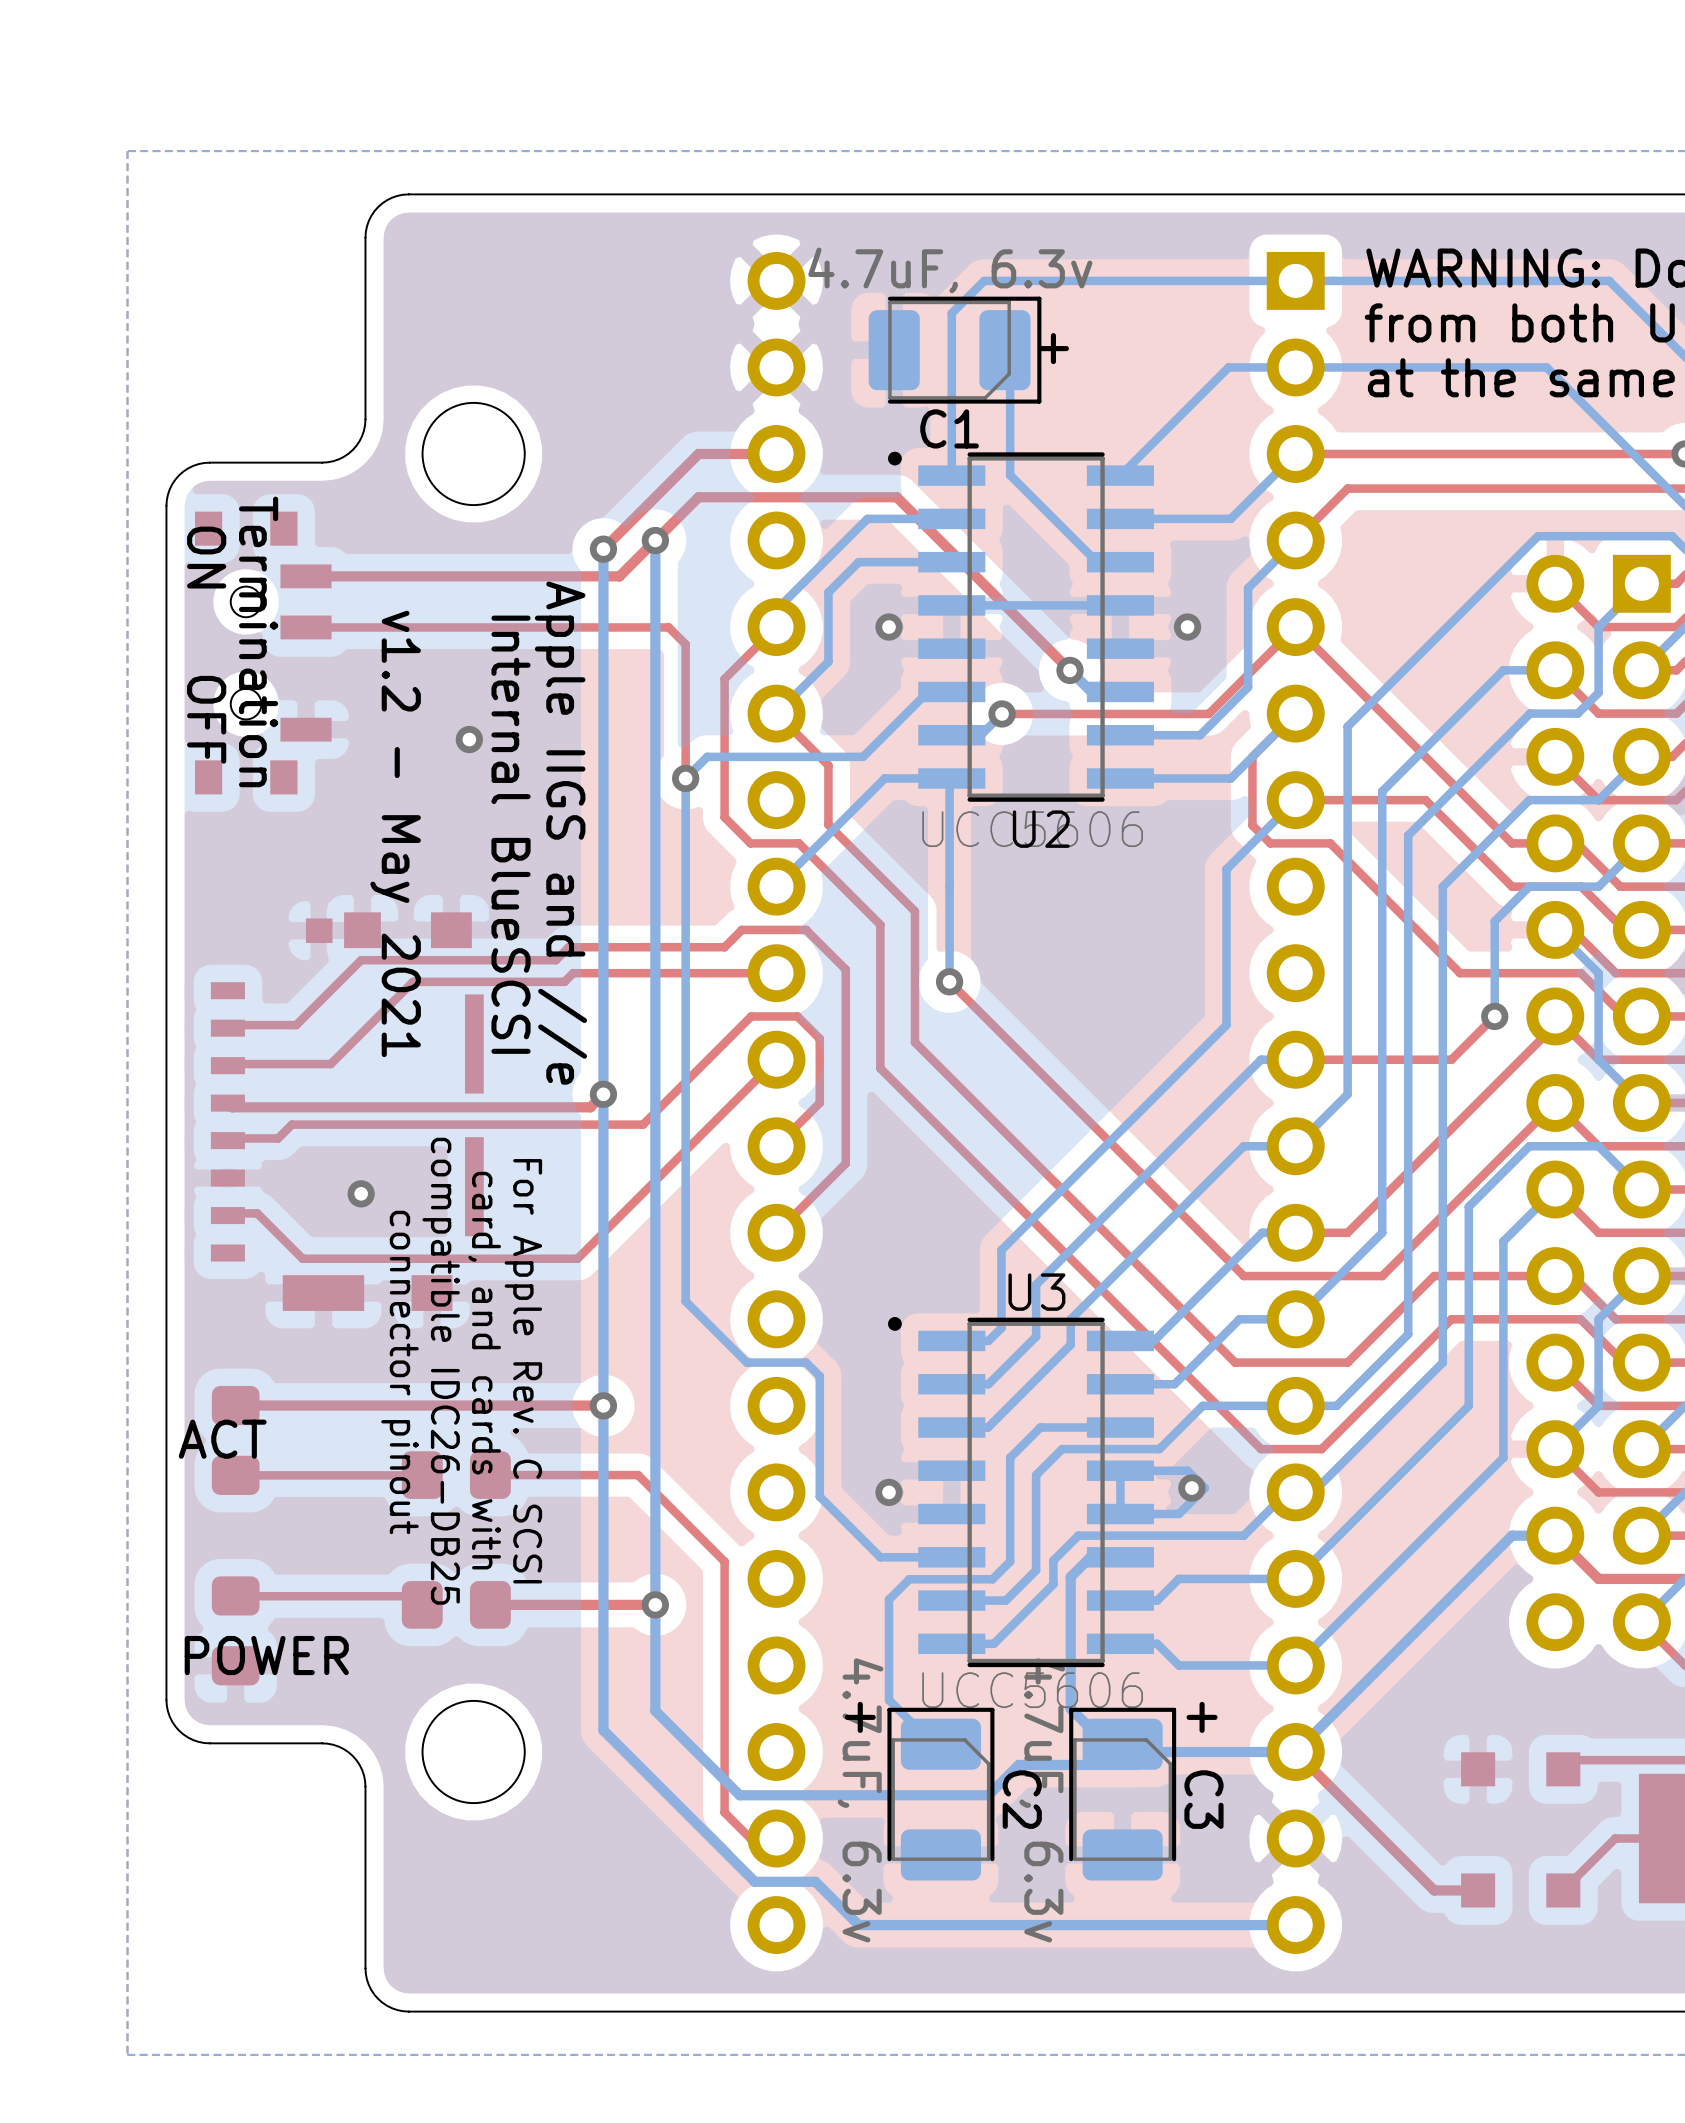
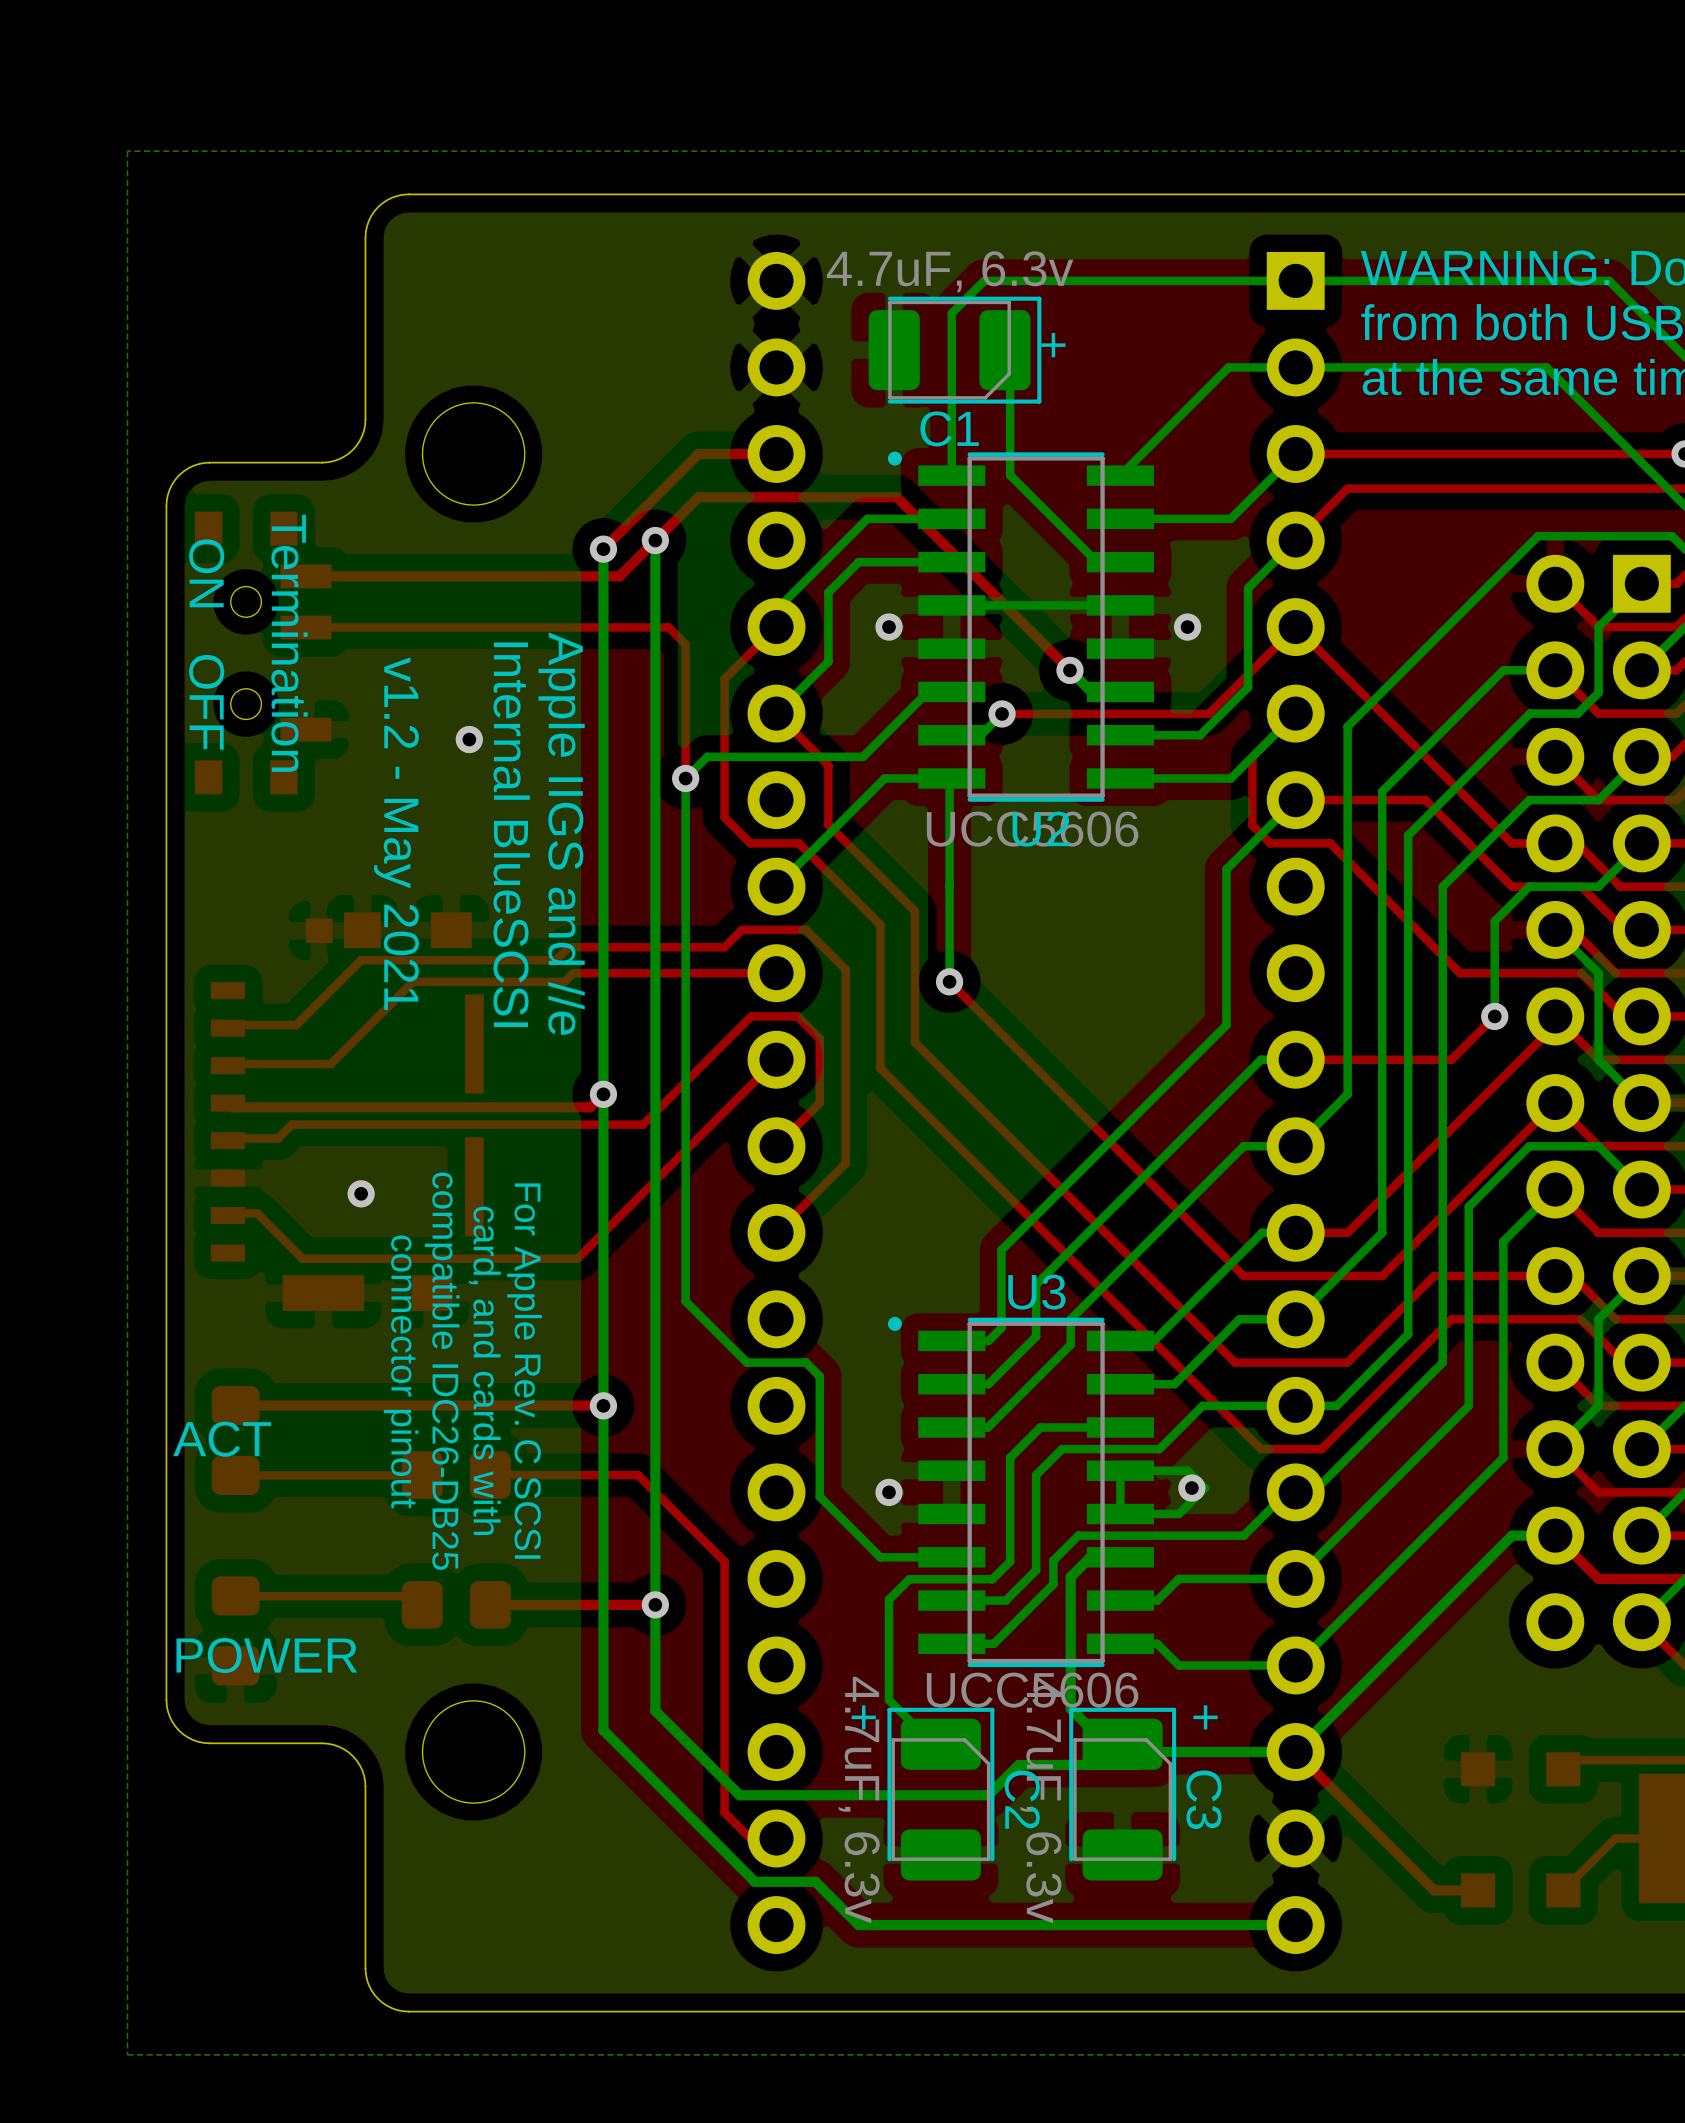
text position: Termination (258, 641) -> Termination (289, 643)

